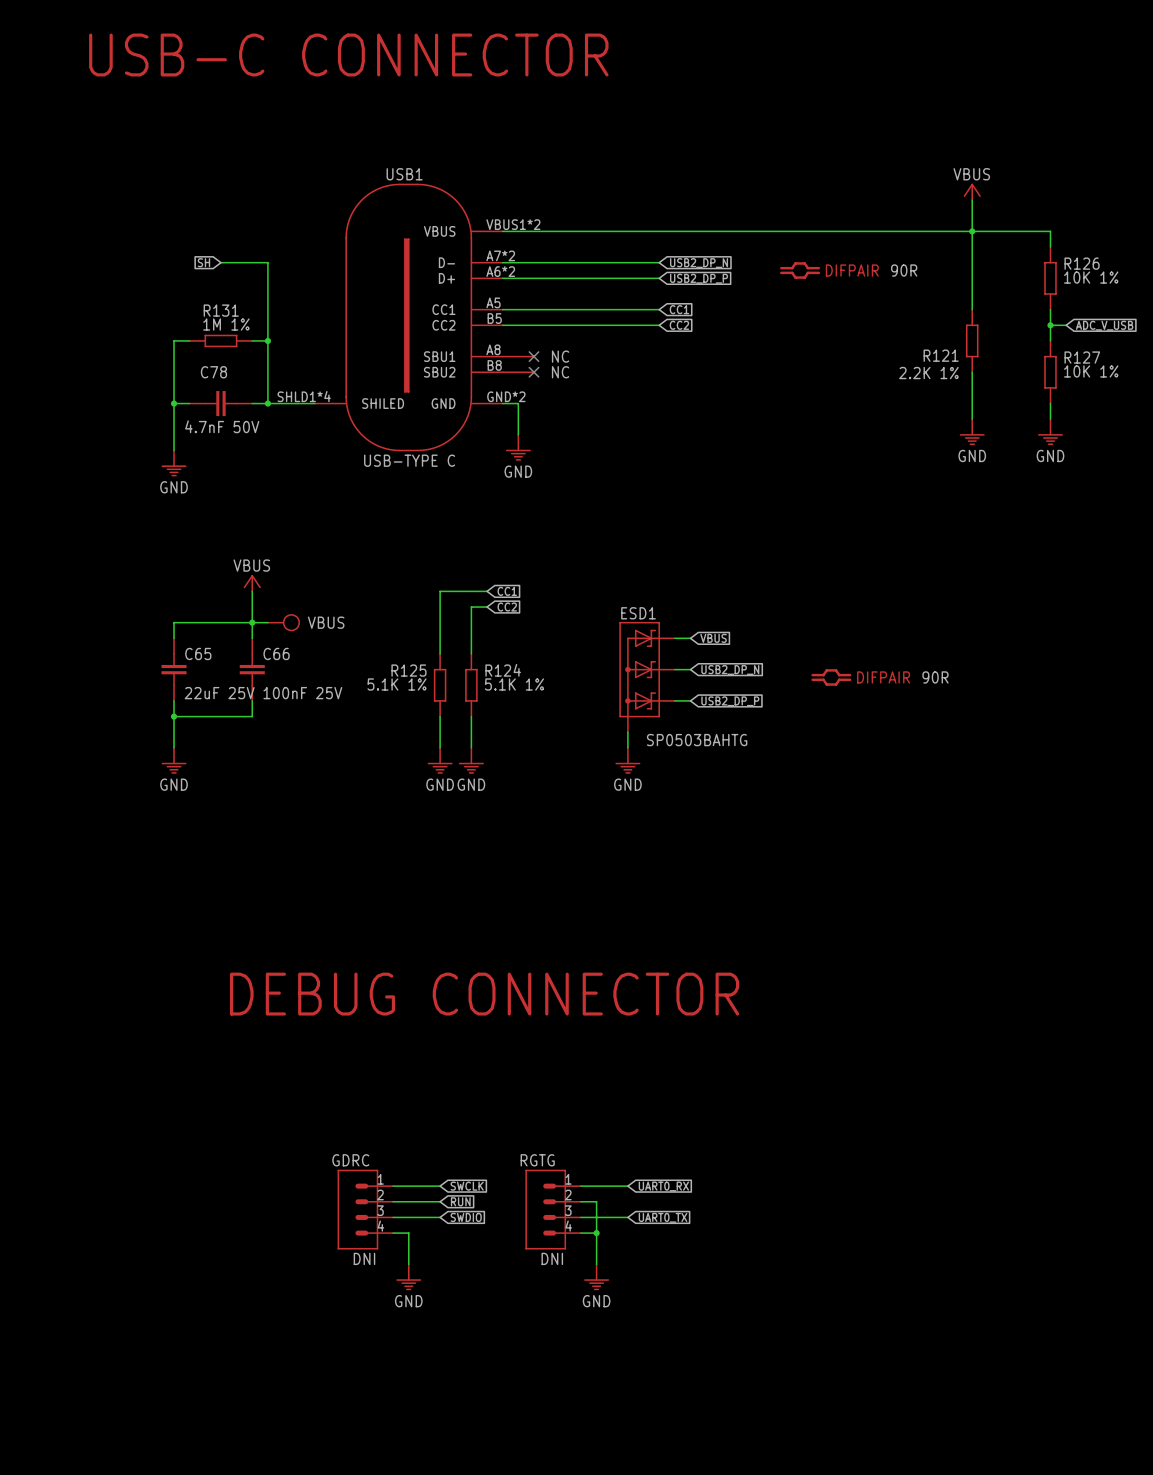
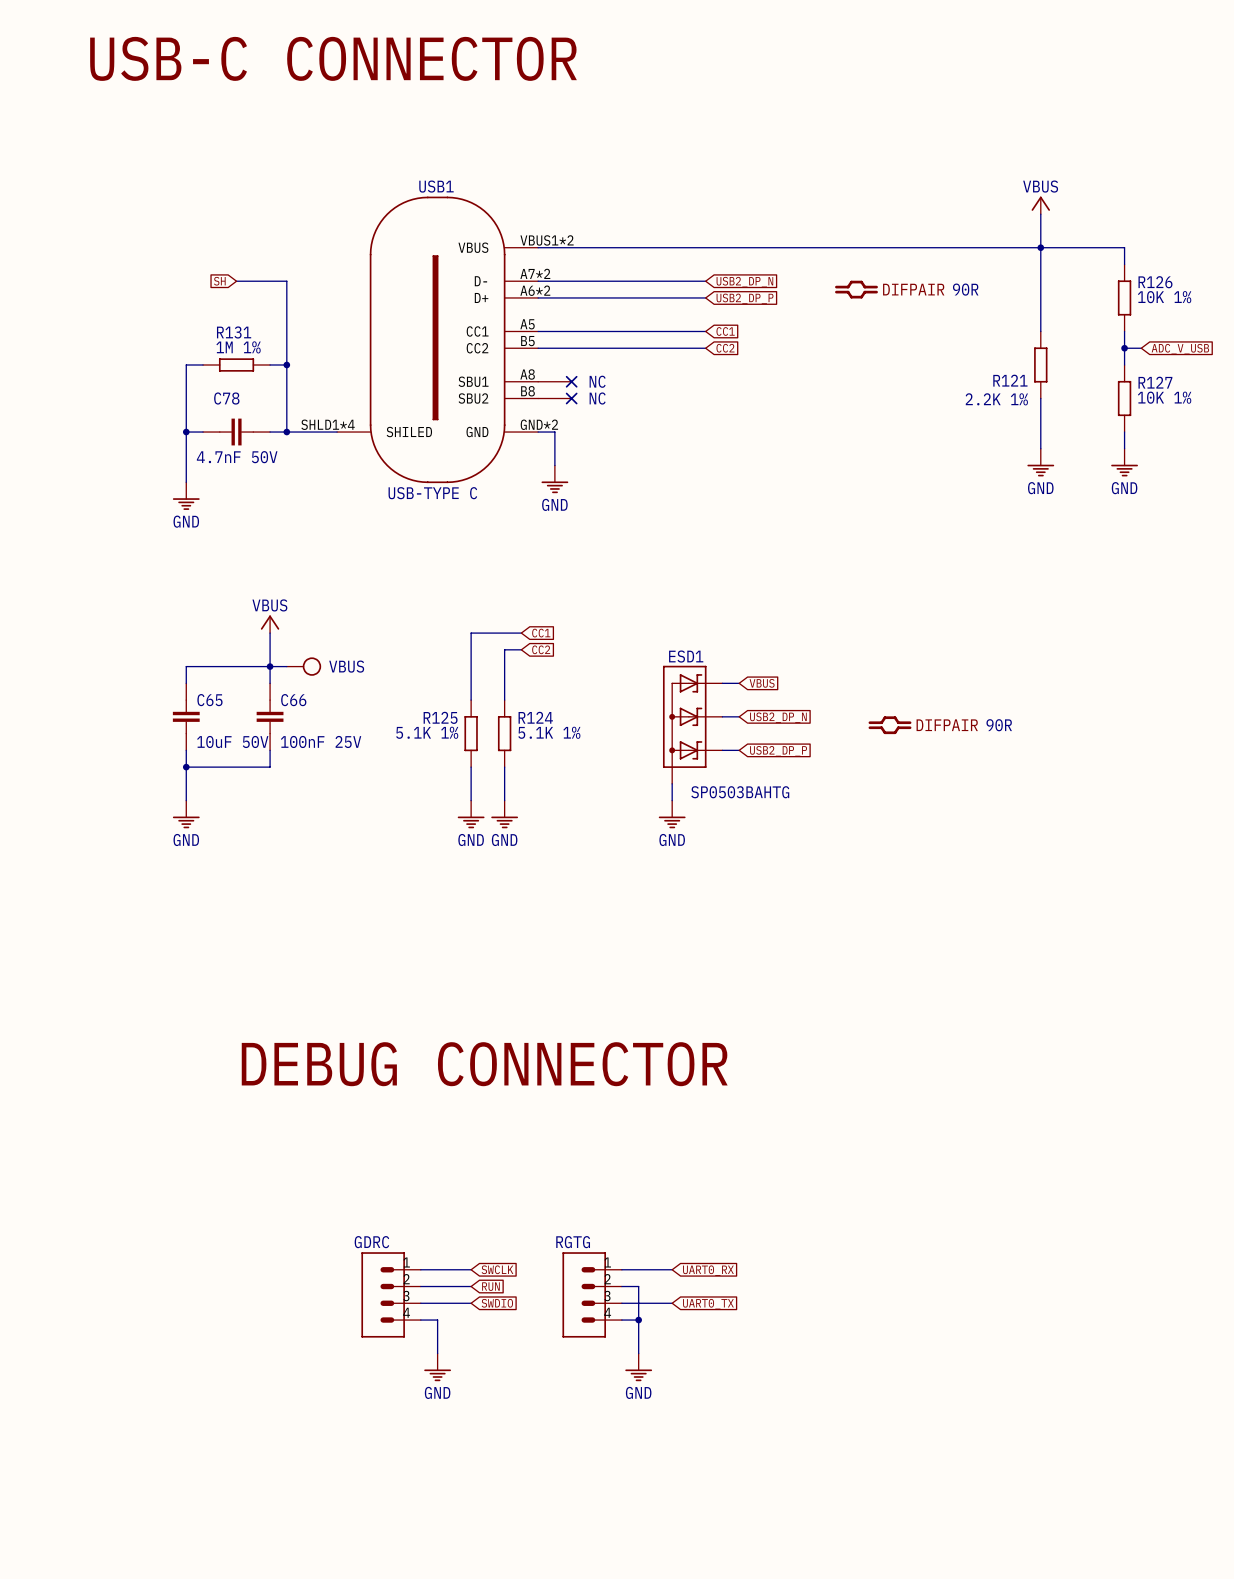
C65 value: 22uF 25V (219, 693) -> 10uF 50V (232, 741)
GDRC value: DNI (364, 1258) -> none
RGTG value: DNI (552, 1258) -> none

